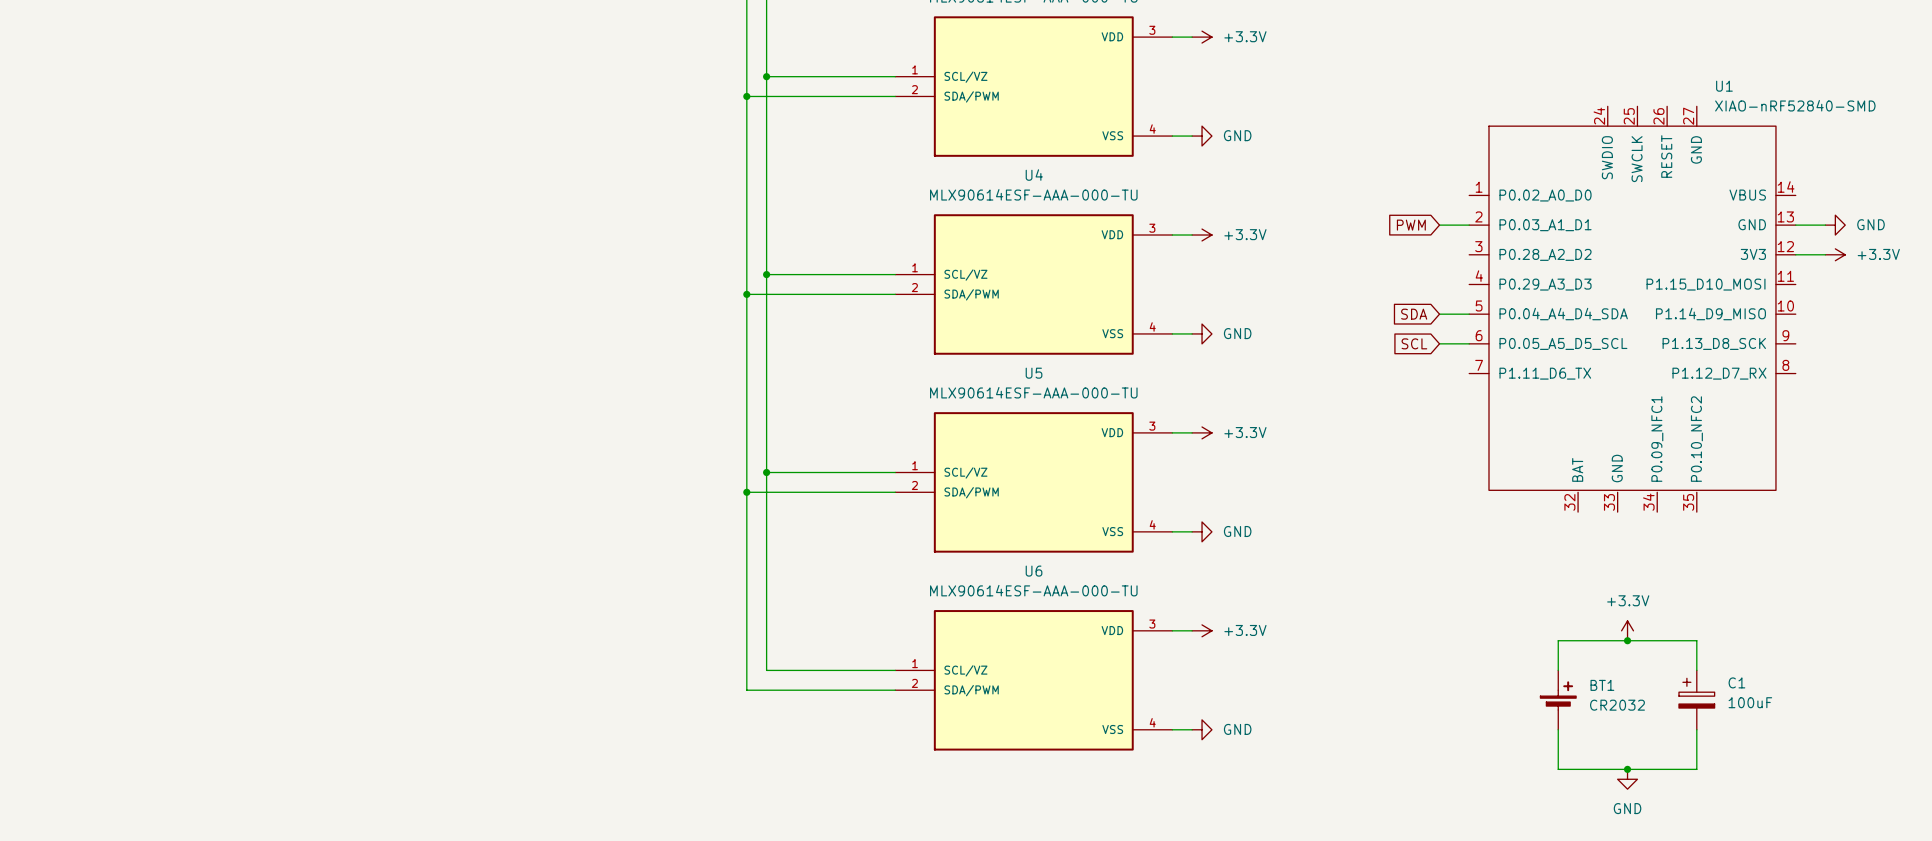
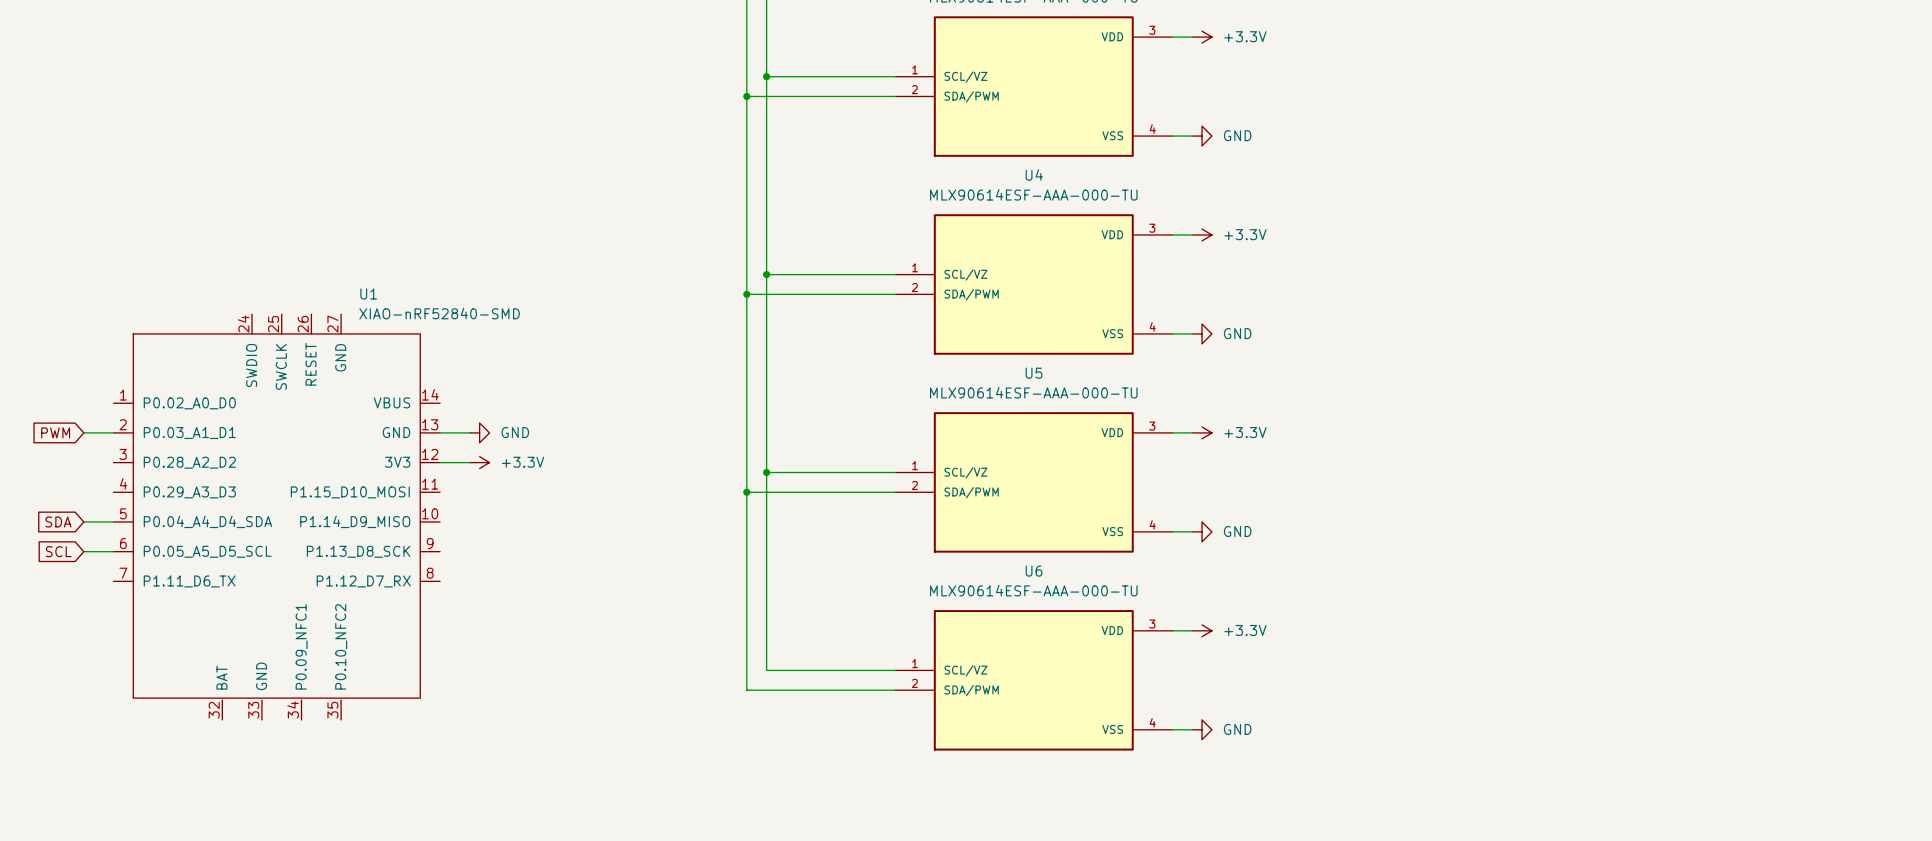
global label: PWM (1411, 225) -> none
wire: (1439, 225) (1469, 225) -> none
wire: (1795, 225) (1825, 225) -> none
power symbol: GND (1835, 225) -> none
wire: (1795, 254) (1825, 254) -> none
power symbol: +3.3V (1835, 254) -> none
U1 position: (1632, 309) -> (276, 517)
global label: SDA (1414, 314) -> none
wire: (1439, 314) (1469, 314) -> none
global label: SCL (1414, 343) -> none
wire: (1439, 343) (1469, 343) -> none
global label: none -> PWM (55, 432)
wire: none -> (83, 432) (113, 432)
wire: none -> (440, 432) (469, 432)
power symbol: none -> GND (479, 432)
wire: none -> (440, 462) (469, 462)
power symbol: none -> +3.3V (479, 462)
global label: none -> SDA (58, 521)
wire: none -> (83, 521) (113, 521)
global label: none -> SCL (58, 551)
wire: none -> (83, 551) (113, 551)
power symbol: +3.3V (1627, 630) -> none
junction: (1627, 640) -> none
wire: (1558, 670) (1558, 640) (1696, 640) (1696, 670) -> none
BT1: CR2032 (1558, 700) -> none
C1: 100uF (1696, 700) -> none
wire: (1558, 729) (1558, 769) (1696, 769) (1696, 729) -> none
junction: (1627, 769) -> none
power symbol: GND (1627, 779) -> none

